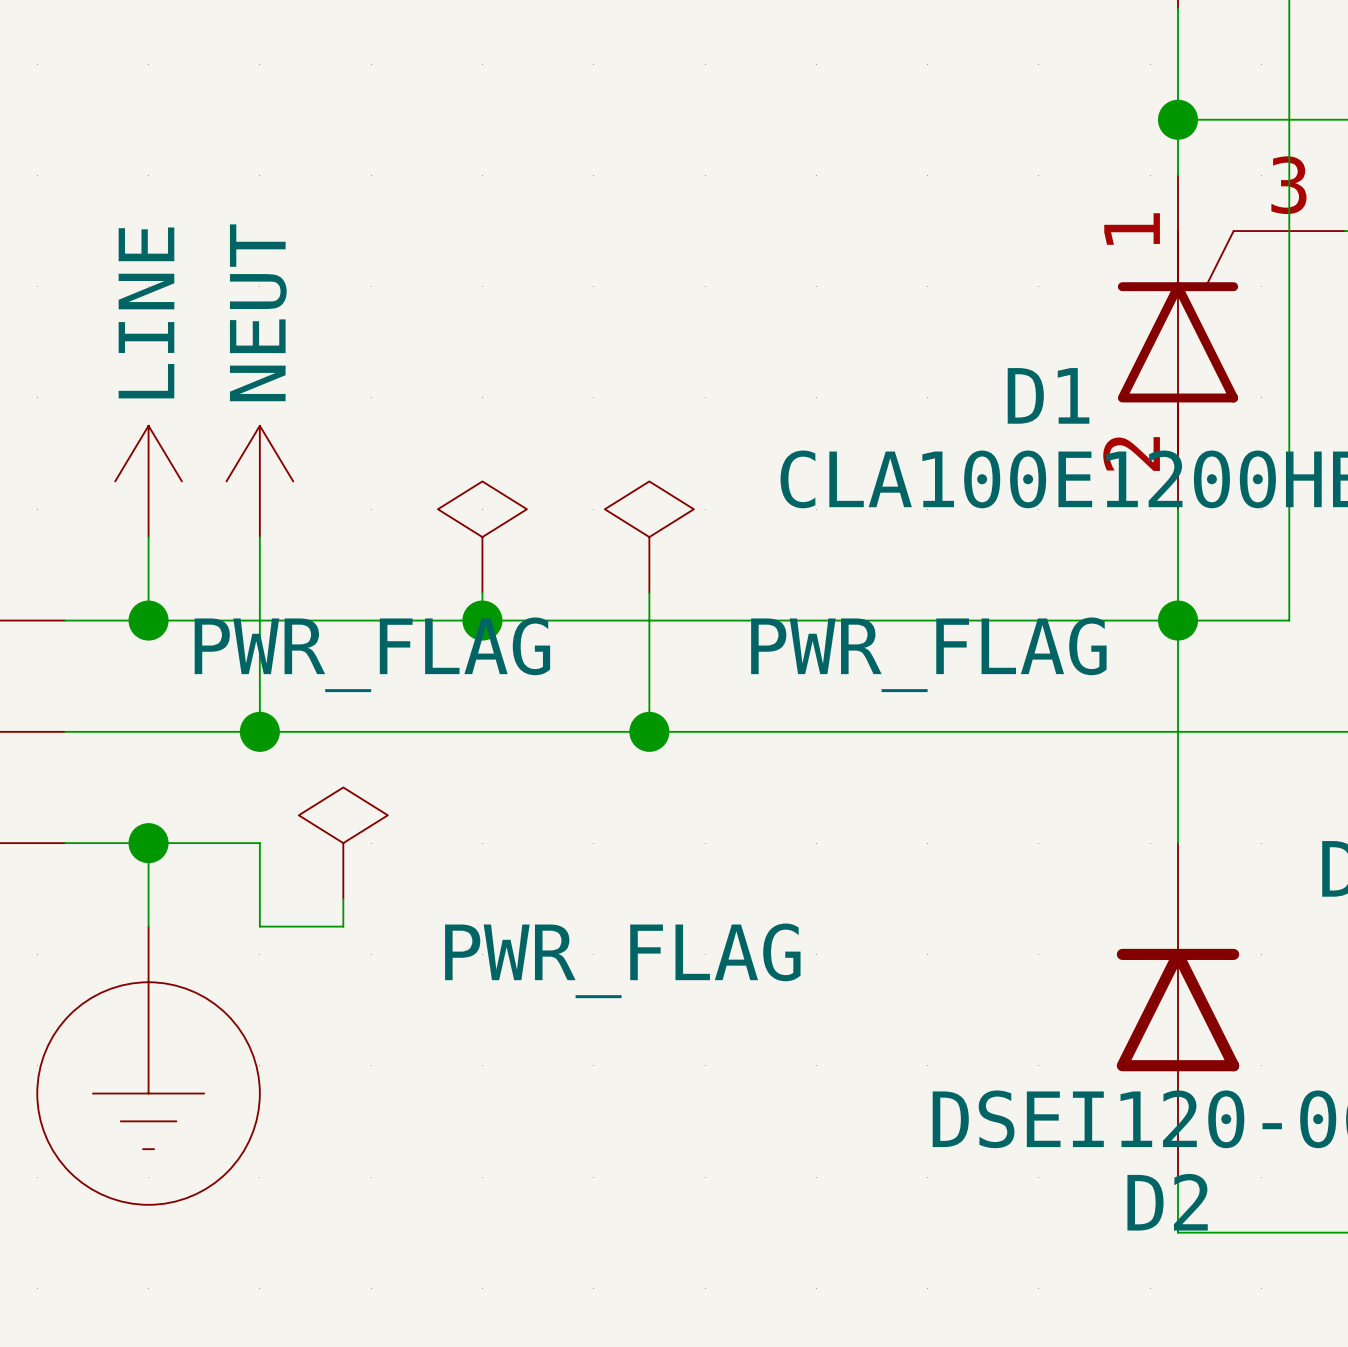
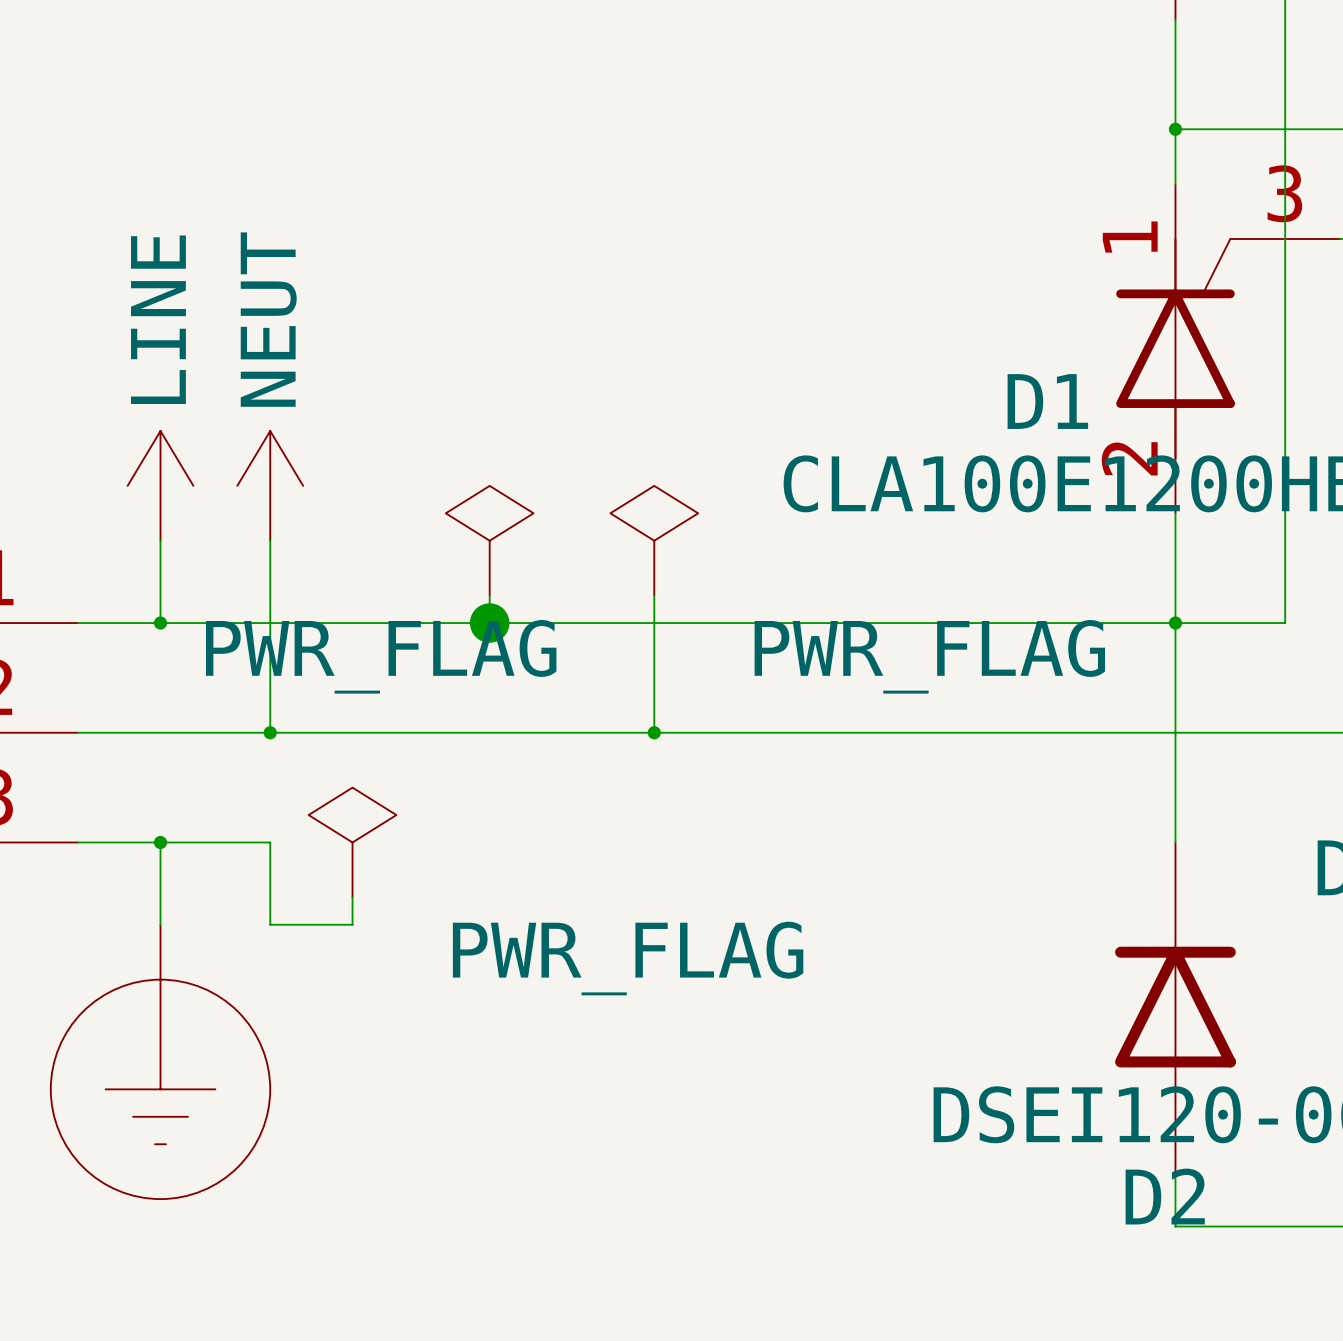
junction size: [1157, 99, 1199, 140] -> [1168, 122, 1183, 136]
junction size: [128, 600, 169, 641] -> [153, 616, 168, 630]
junction size: [1157, 600, 1199, 641] -> [1168, 616, 1183, 630]
junction size: [239, 711, 280, 752] -> [263, 726, 277, 740]
junction size: [629, 711, 670, 752] -> [647, 726, 661, 740]
junction size: [128, 823, 169, 864] -> [153, 835, 168, 850]

